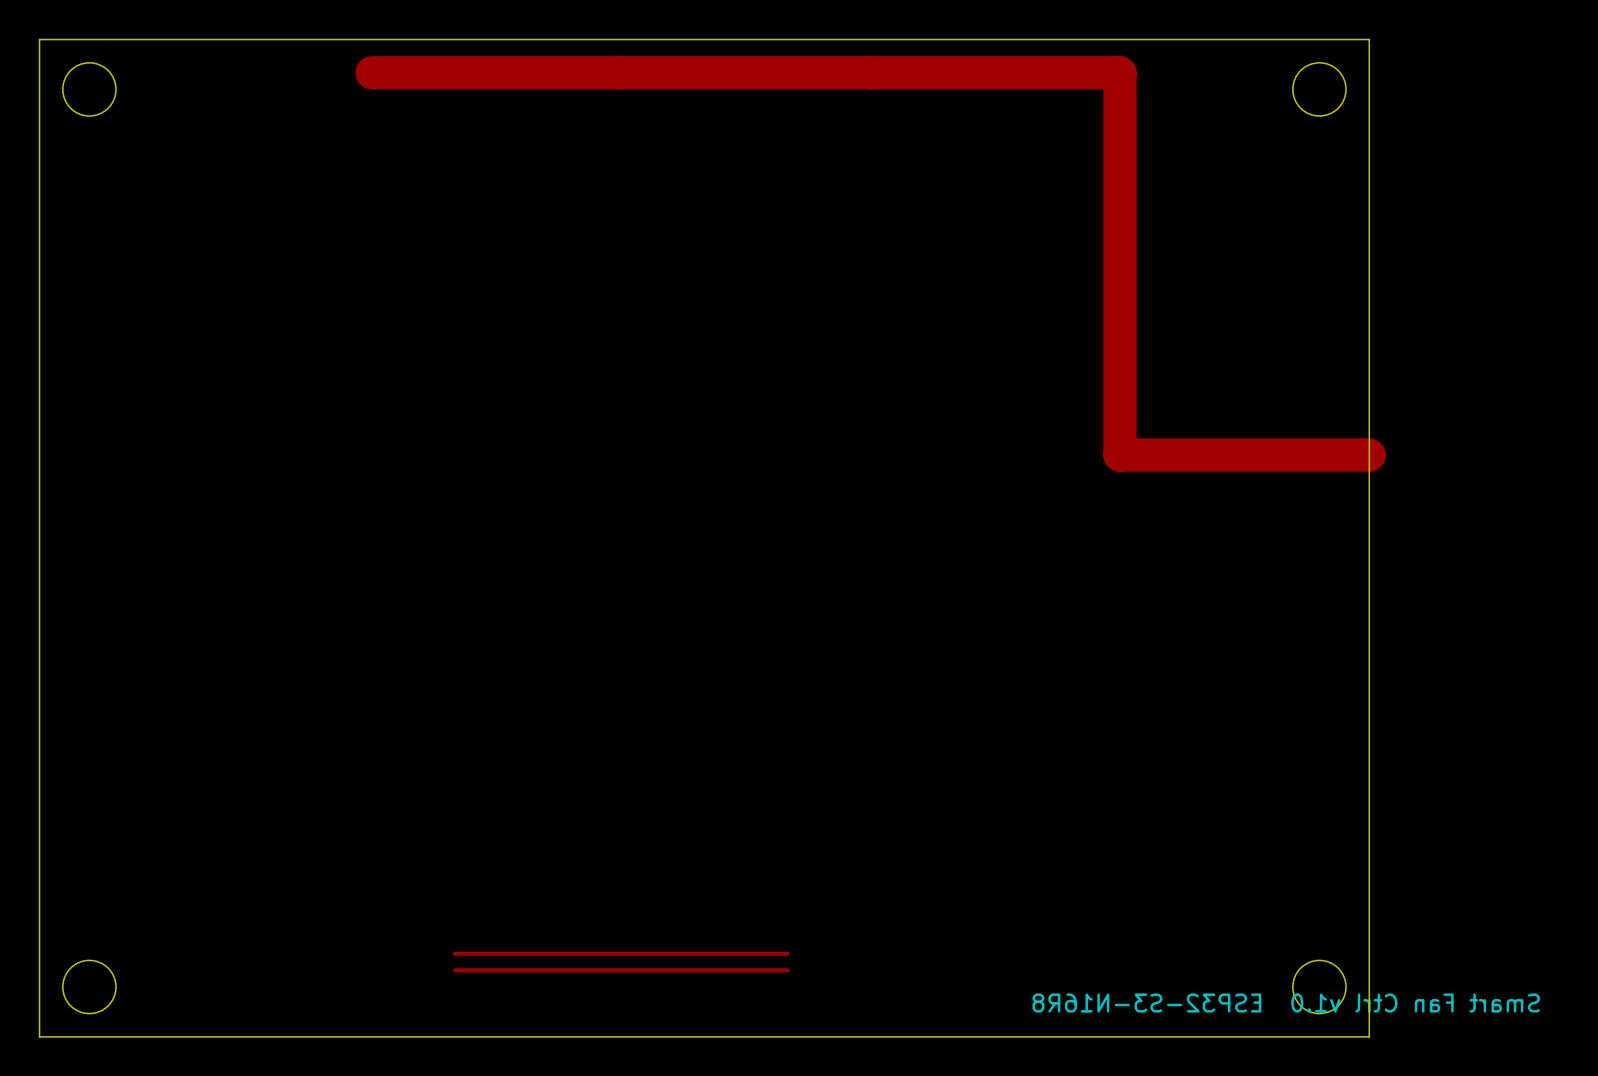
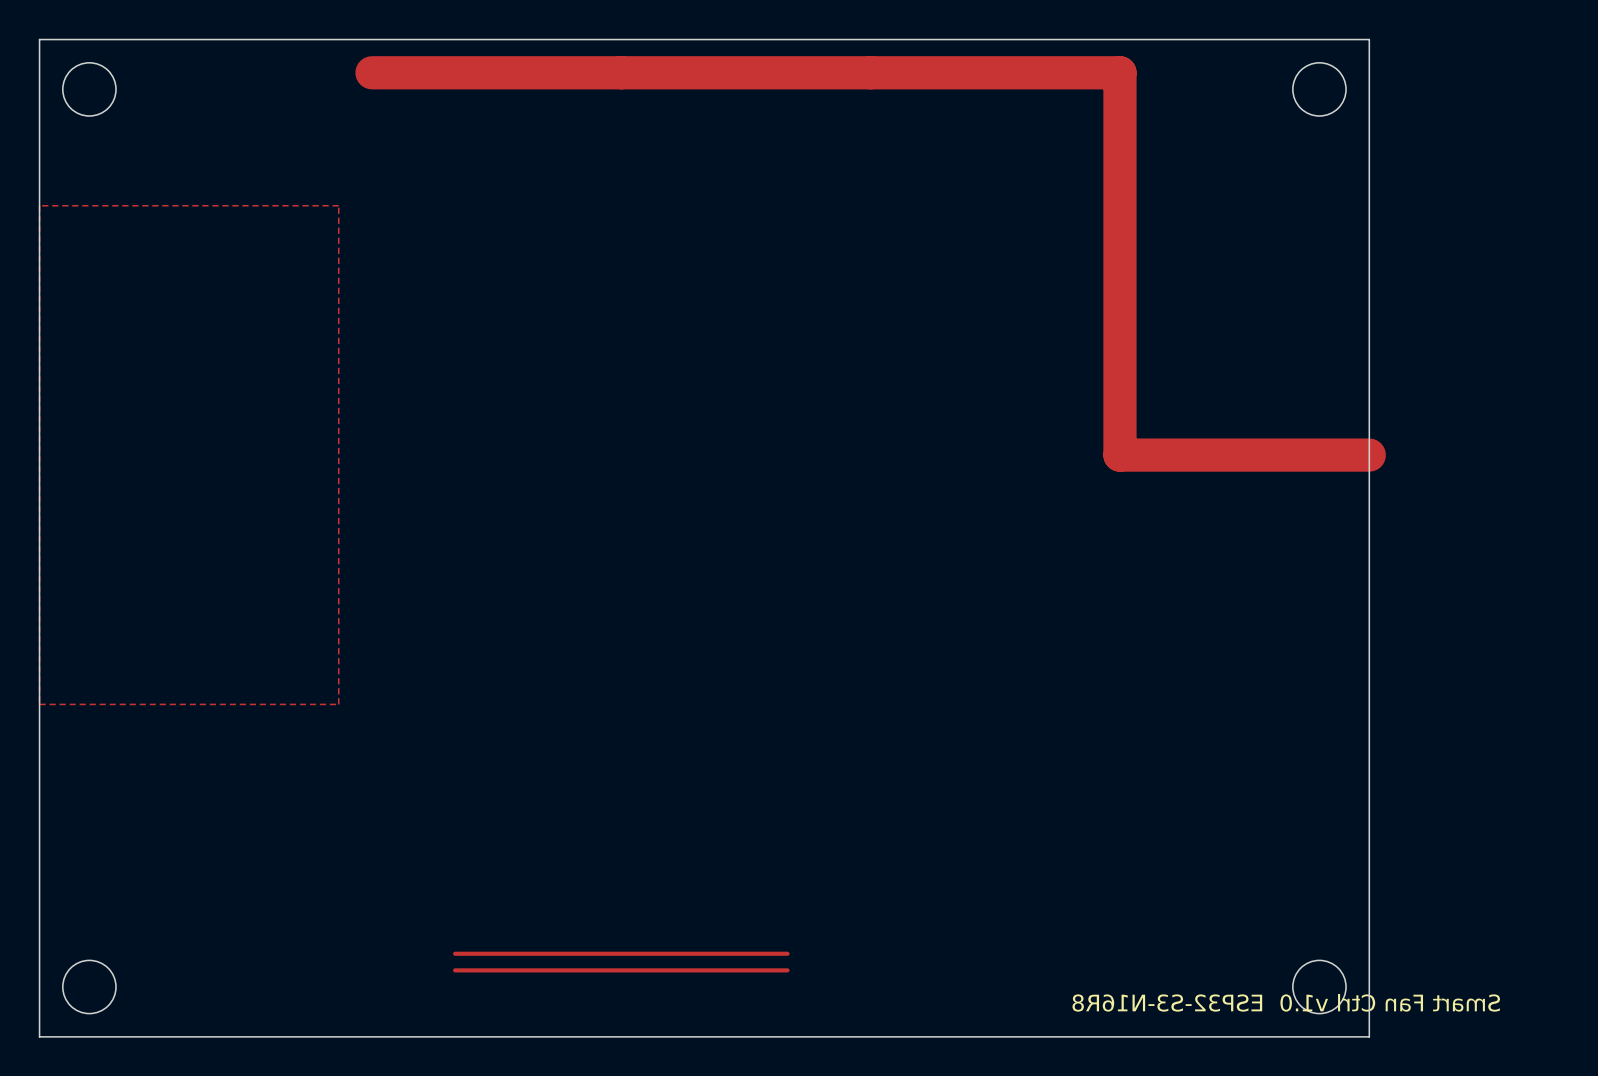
top zone outline: none -> (338, 205) (39, 205) (39, 704) (338, 704) (338, 205)

